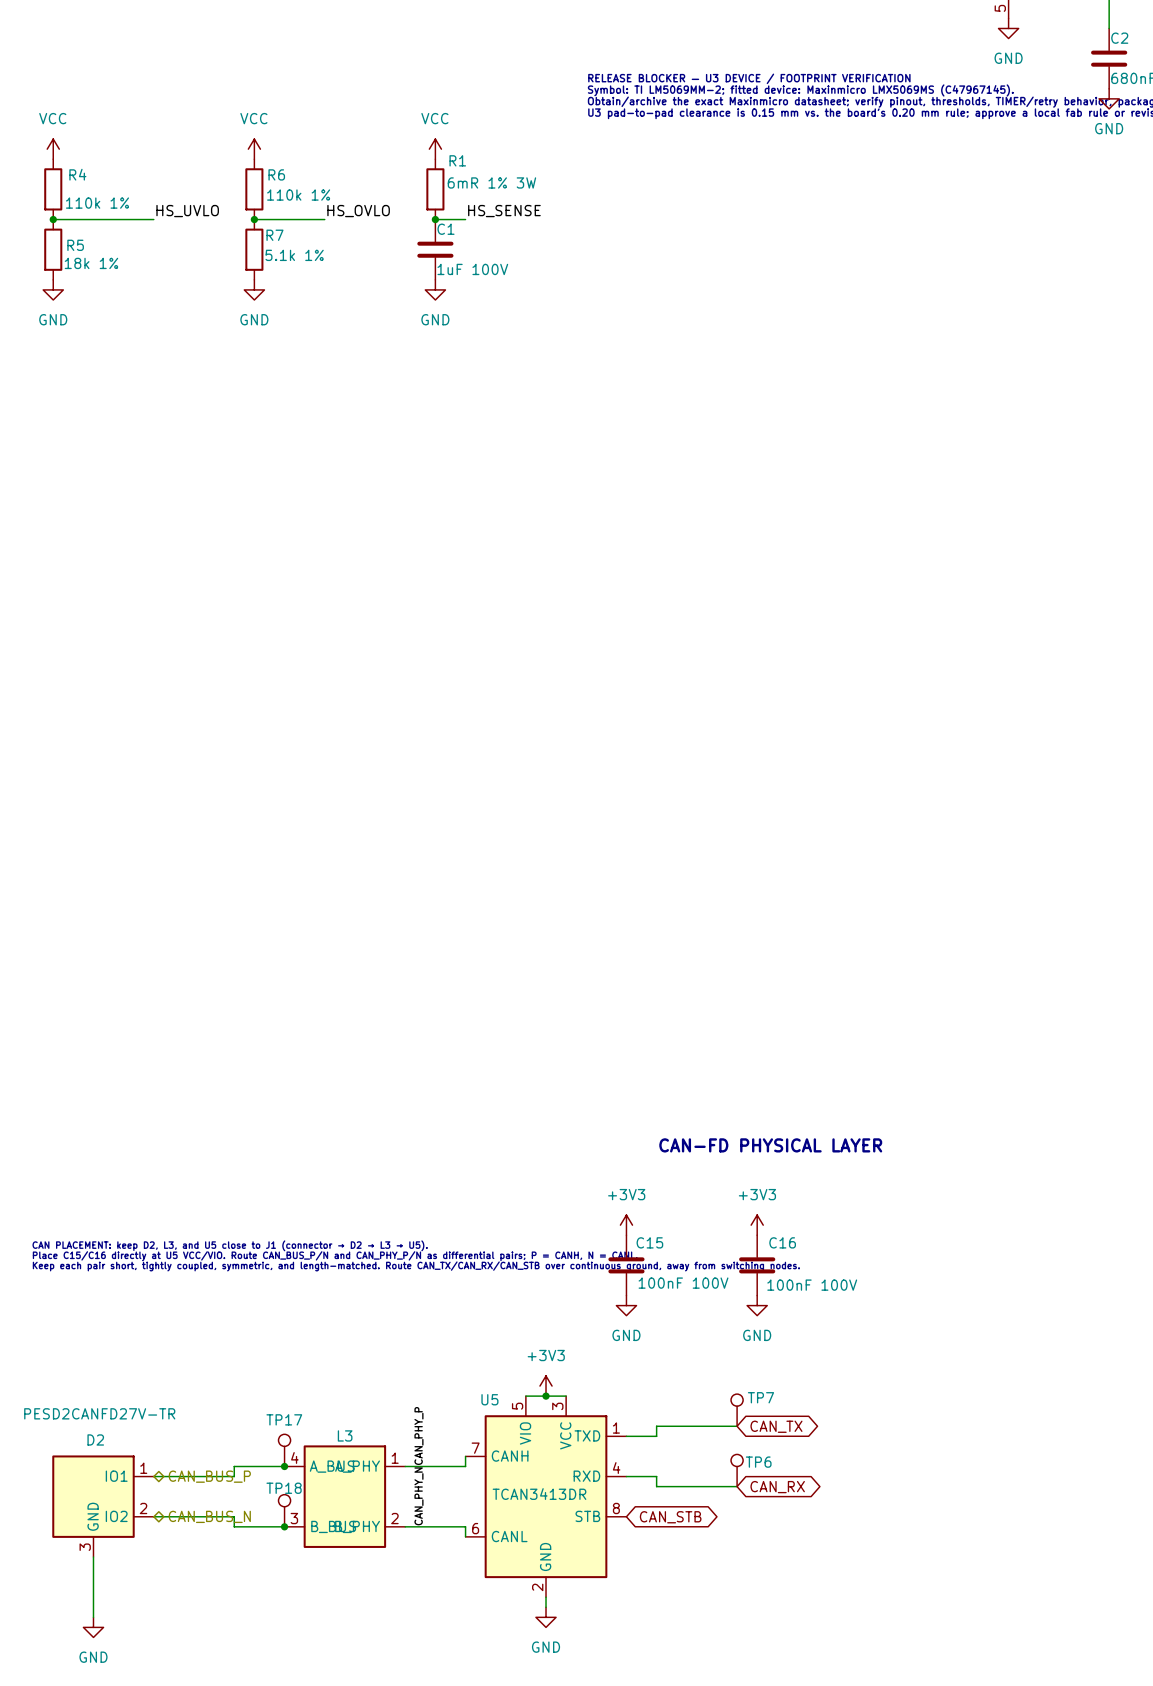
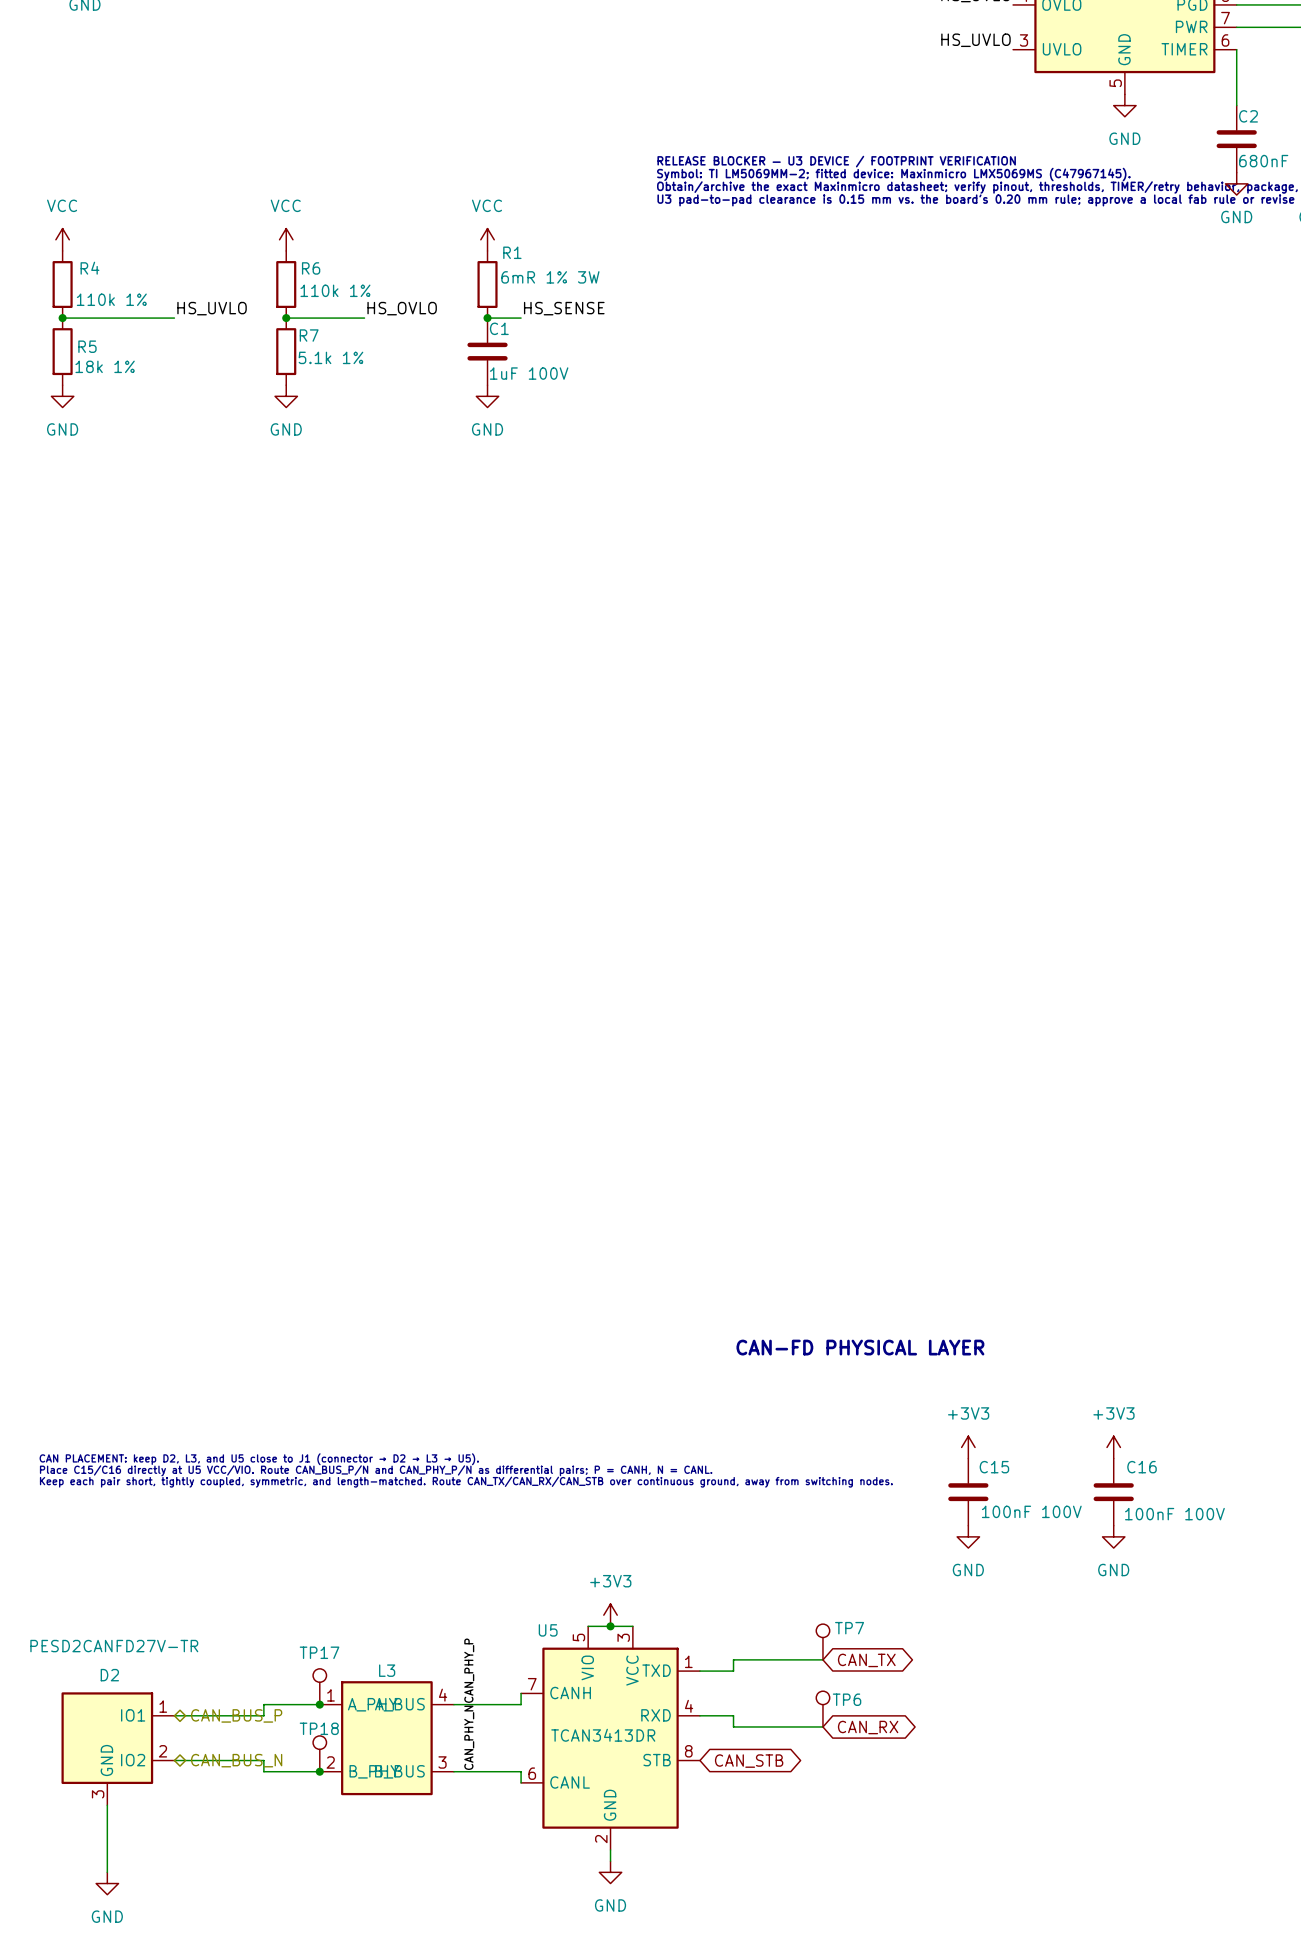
power symbol: +3V3 (626, 1225) -> none
power symbol position: +3V3 (757, 1225) -> +3V3 (968, 1447)
power symbol: none -> +3V3 (1113, 1447)
C15 position: (626, 1265) -> (968, 1492)
C16 position: (757, 1265) -> (1113, 1492)
power symbol: GND (626, 1305) -> none
power symbol position: GND (757, 1305) -> GND (968, 1536)
power symbol: none -> GND (1113, 1536)
L3 flip: as is (344, 1496) -> left-right (386, 1738)

